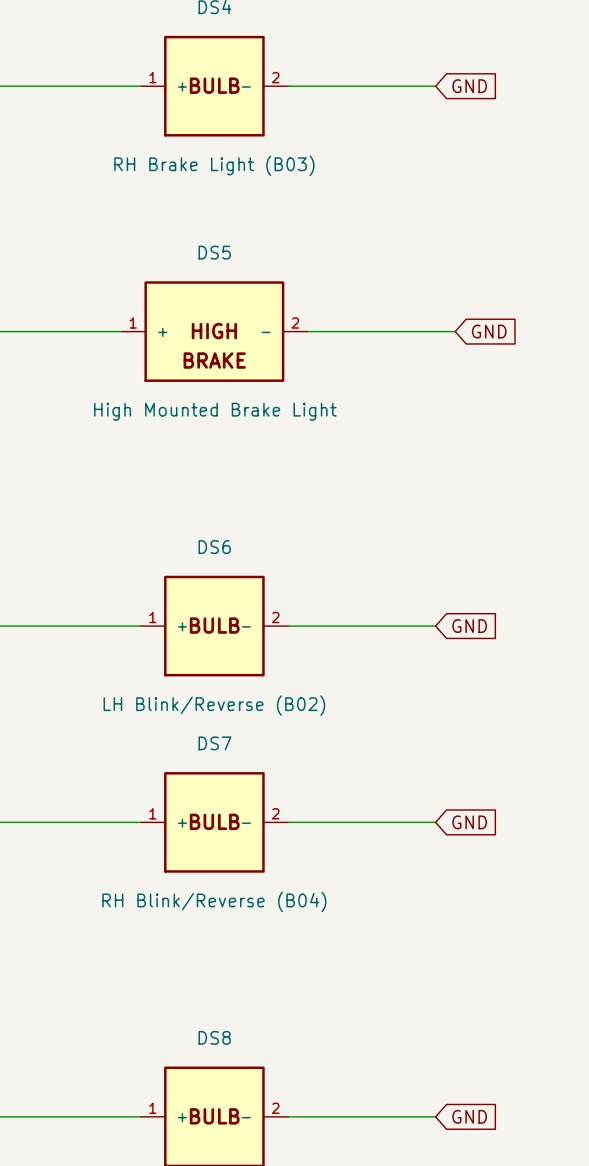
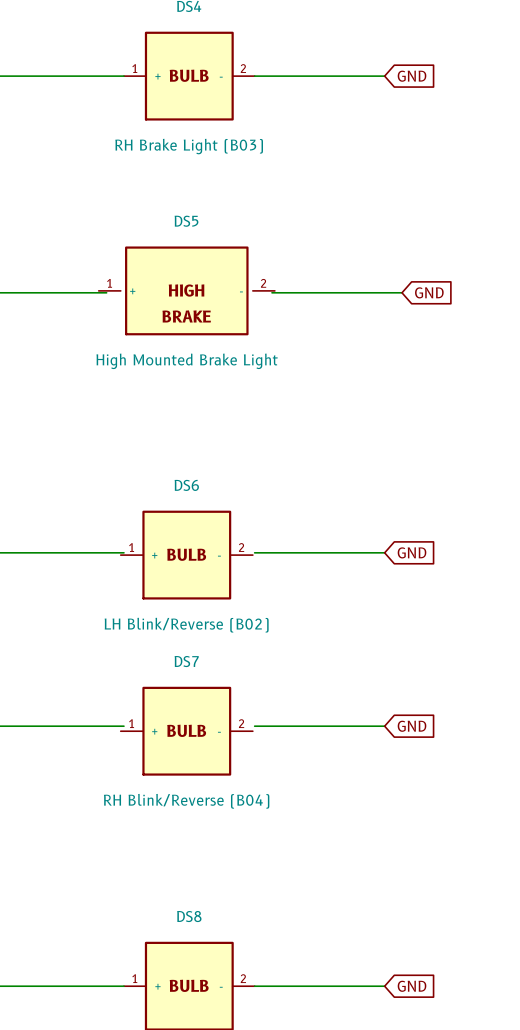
DS5 symbol: [120, 281, 309, 382] -> [98, 246, 275, 336]
DS6 symbol: [140, 575, 289, 677] -> [120, 510, 253, 600]
DS7 symbol: [140, 772, 289, 873] -> [120, 686, 253, 776]

